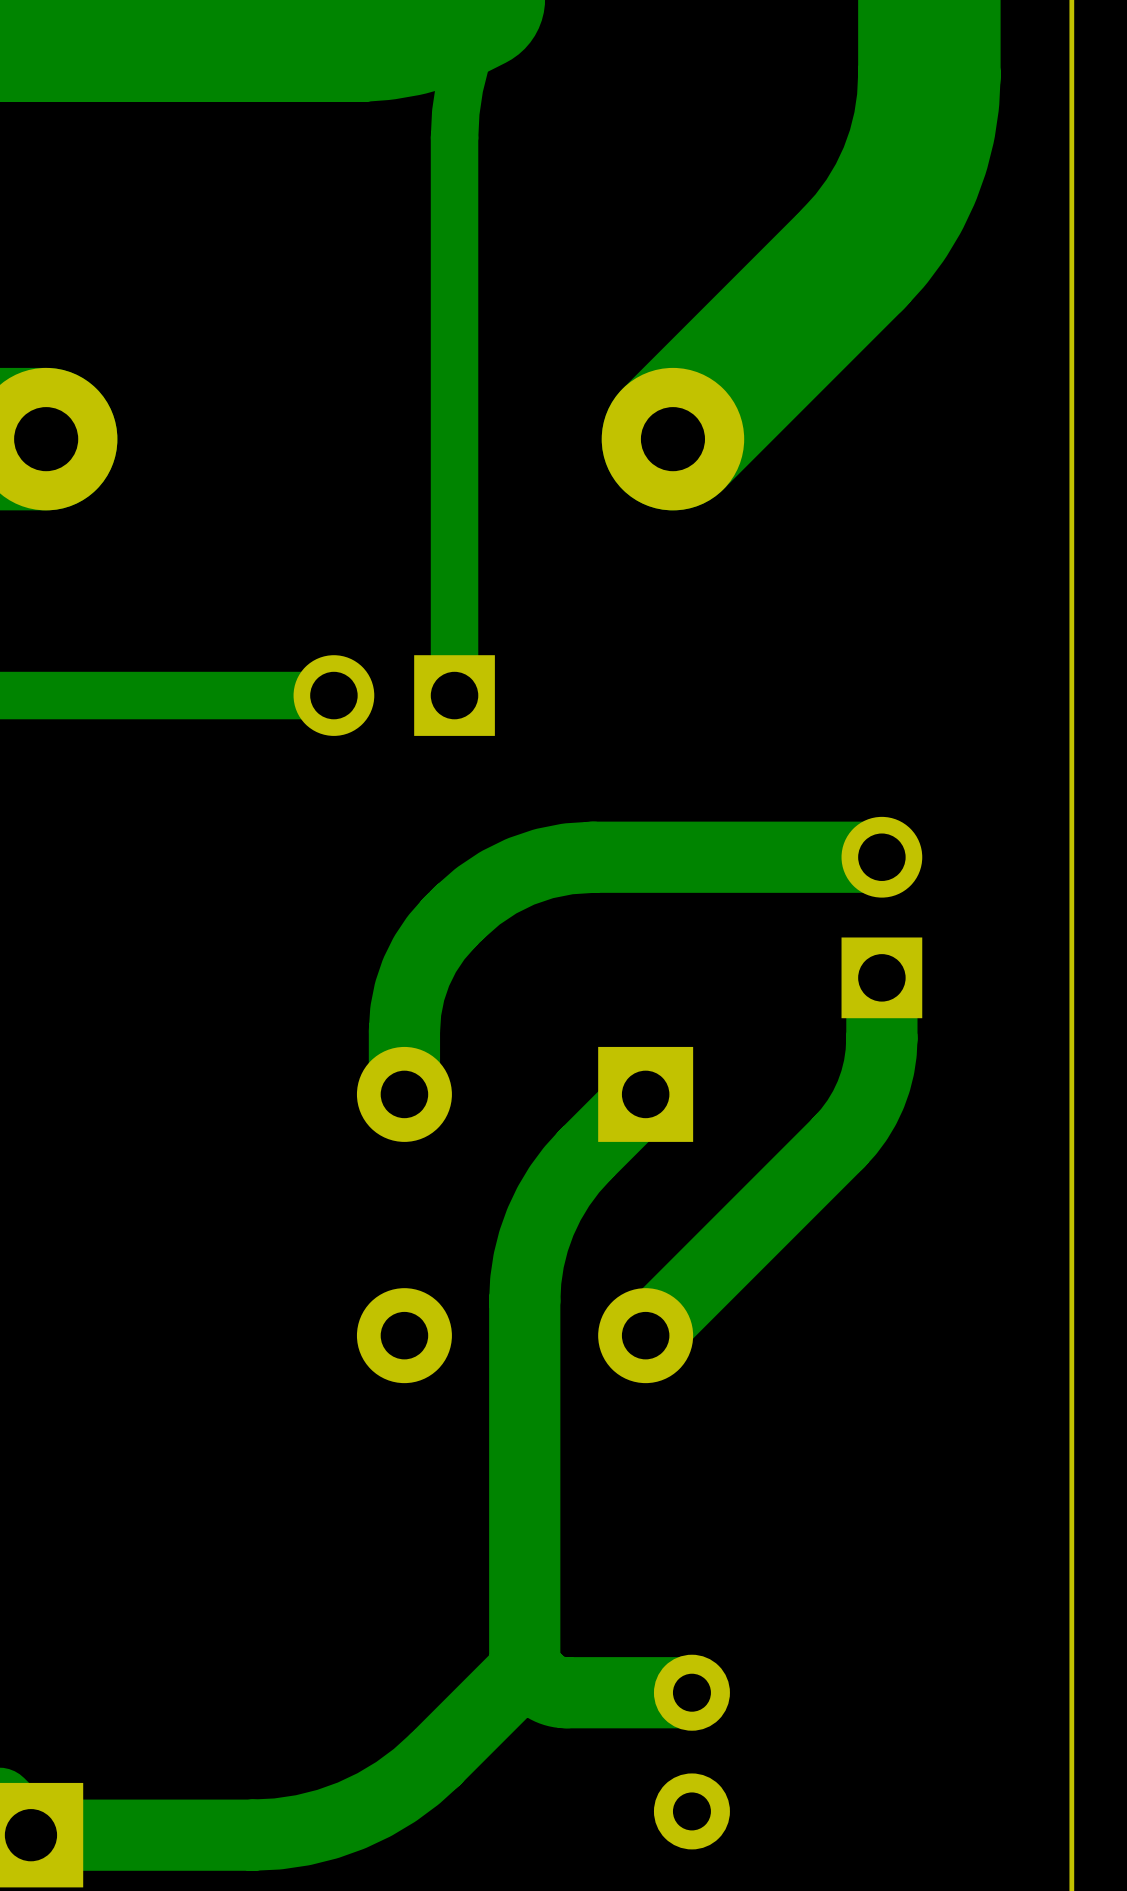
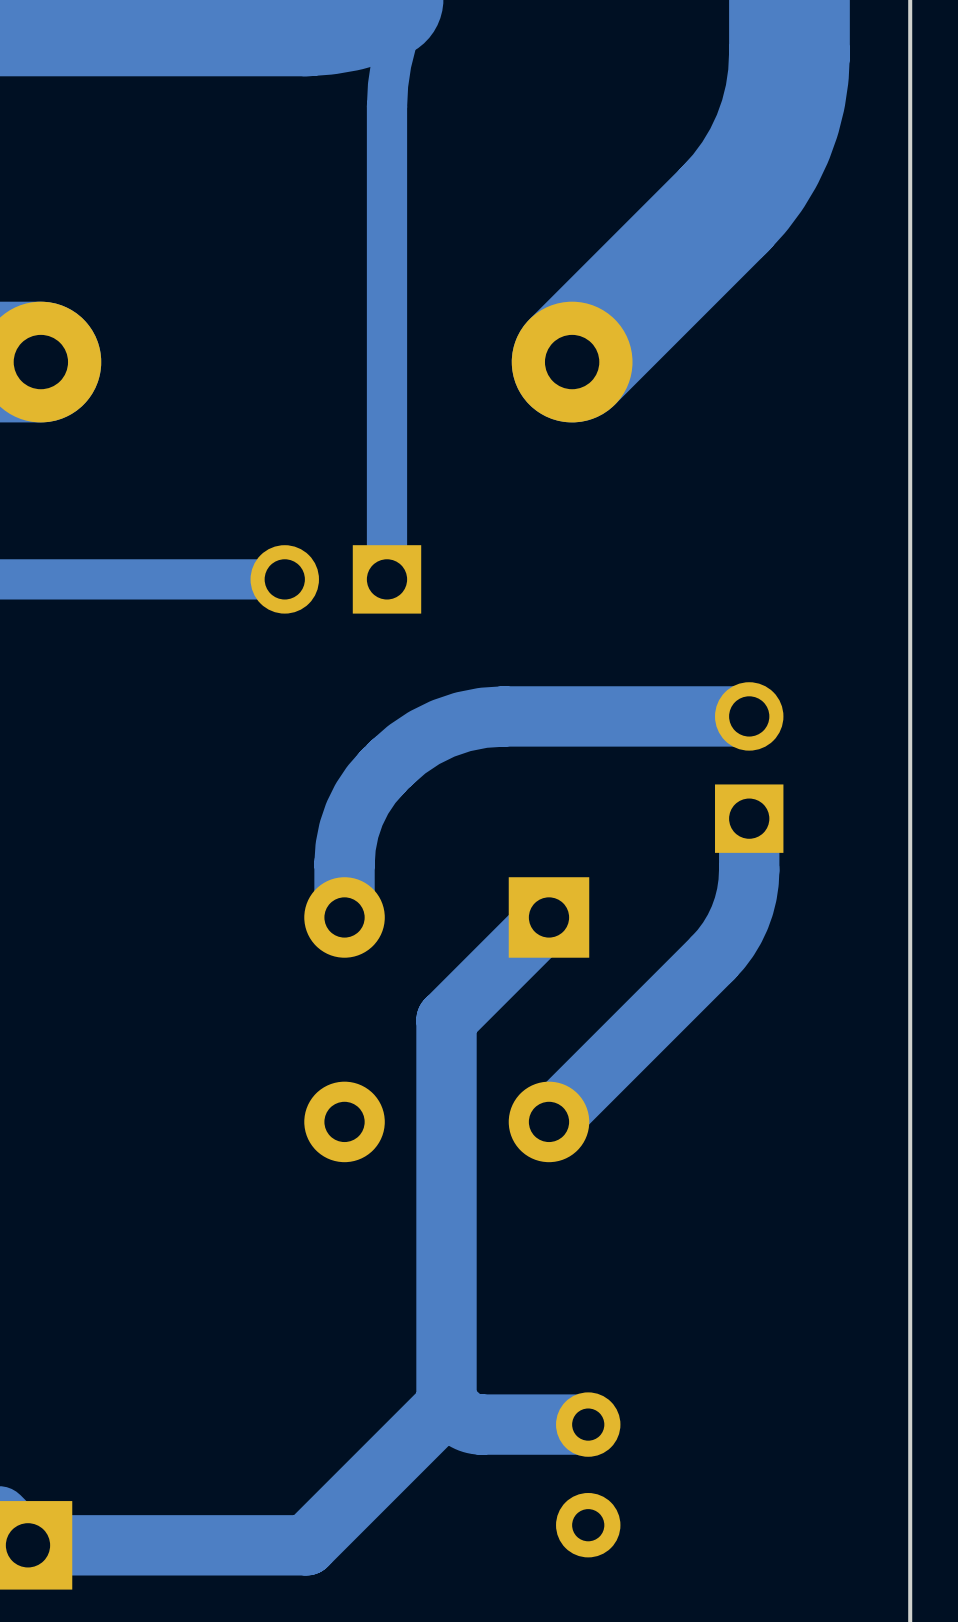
track: (585, 1154) (559, 1186) (540, 1221) (528, 1260) (524, 1300) -> (497, 968) (446, 1019) (446, 1092)
track: (435, 1759) (396, 1791) (351, 1815) (302, 1830) (252, 1835) -> (370, 1481) (306, 1545) (215, 1545)

